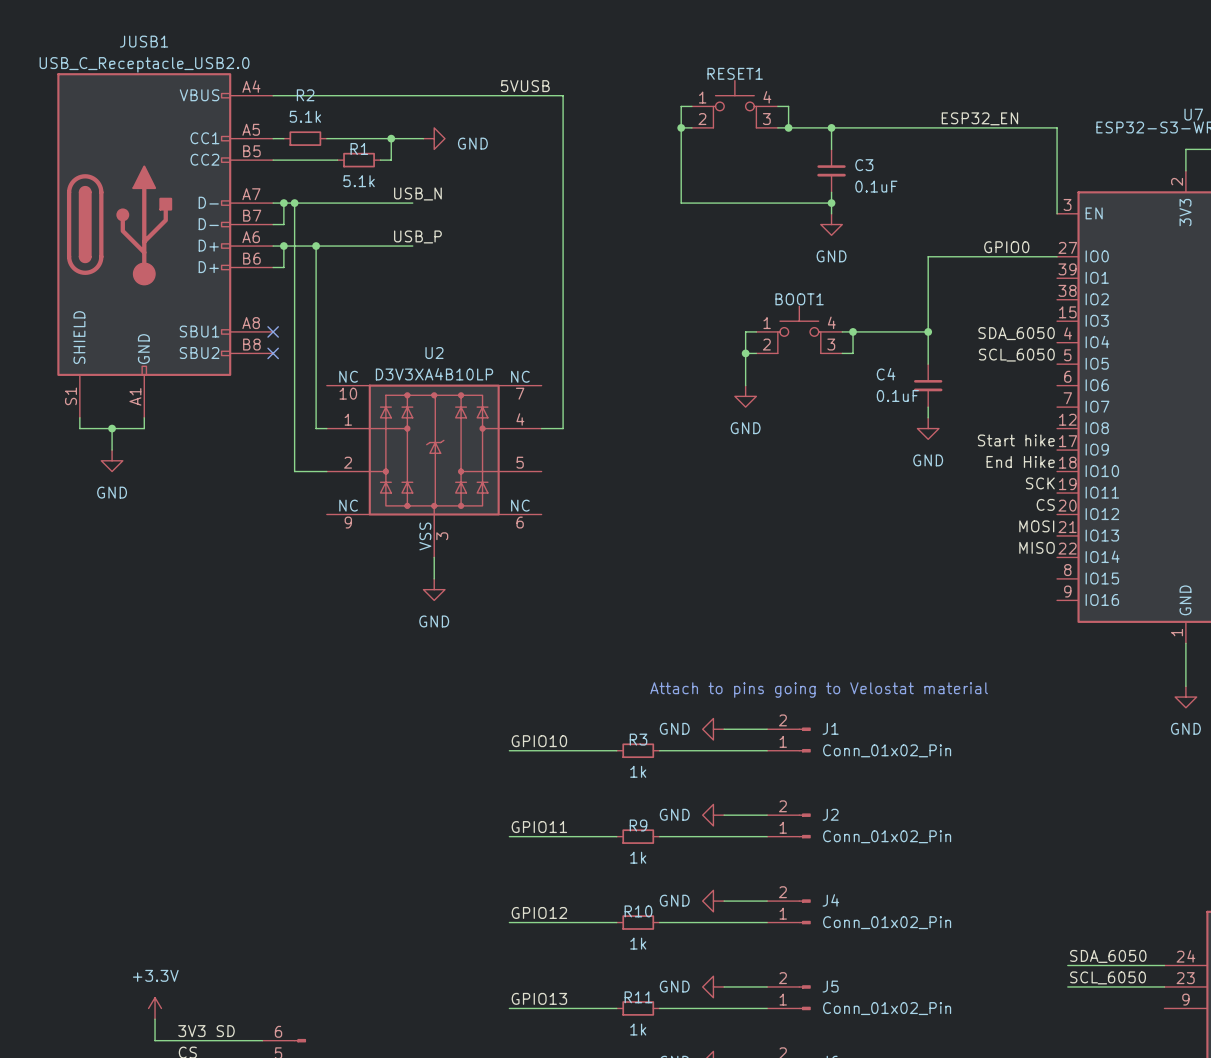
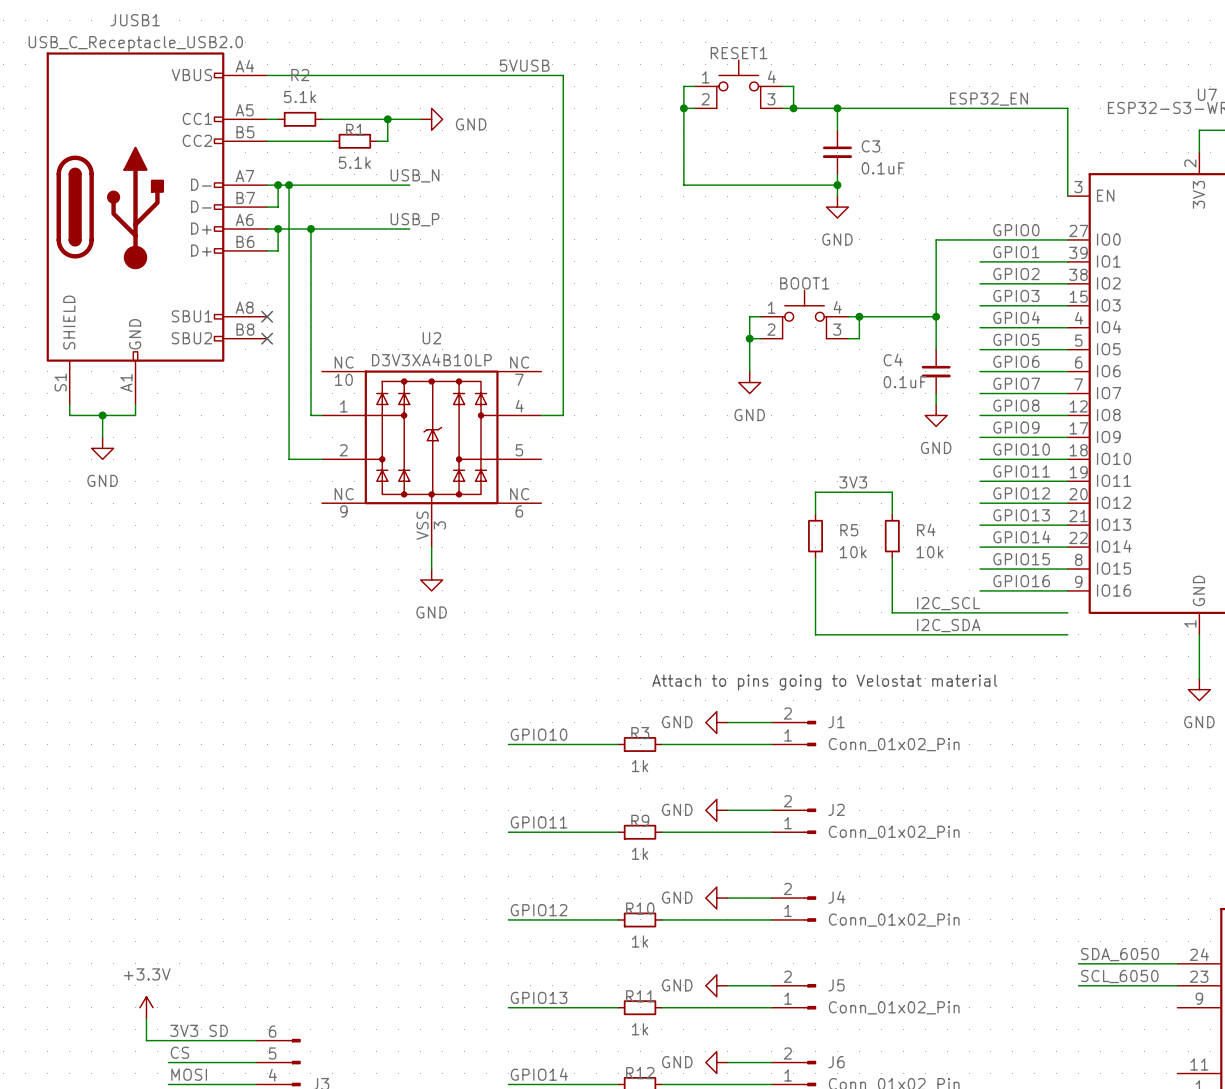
label: none -> GPIO1 (1016, 252)
wire: none -> (980, 261) (1067, 261)
label: none -> GPIO2 (1016, 274)
wire: none -> (980, 283) (1067, 283)
label: none -> GPIO3 (1016, 295)
wire: none -> (980, 305) (1067, 305)
label: none -> GPIO4 (1016, 317)
label: SDA_6050 (1016, 333) -> none
wire: none -> (980, 327) (1067, 327)
label: none -> GPIO5 (1016, 339)
label: SCL_6050 (1016, 355) -> none
wire: none -> (980, 349) (1067, 349)
label: none -> GPIO6 (1016, 361)
wire: none -> (980, 371) (1067, 371)
label: none -> GPIO7 (1016, 383)
wire: none -> (980, 393) (1067, 393)
label: none -> GPIO8 (1016, 405)
wire: none -> (980, 415) (1067, 415)
label: none -> GPIO9 (1016, 427)
label: Start hike (1016, 440) -> none
wire: none -> (980, 437) (1067, 437)
label: none -> GPIO10 (1021, 449)
label: End Hike (1020, 461) -> none
wire: none -> (980, 459) (1067, 459)
label: none -> GPIO11 (1021, 471)
label: SCK (1040, 483) -> none
wire: none -> (980, 481) (1067, 481)
label: none -> 3V3 (853, 482)
label: none -> GPIO12 (1021, 493)
label: CS (1045, 504) -> none
wire: none -> (980, 503) (1067, 503)
wire: none -> (815, 514) (815, 492) (892, 492) (892, 514)
label: none -> GPIO13 (1021, 515)
label: MOSI (1036, 526) -> none
wire: none -> (980, 525) (1067, 525)
R5: none -> 10k (815, 536)
R4: none -> 10k (892, 536)
label: none -> GPIO14 (1021, 537)
label: MISO (1037, 547) -> none
wire: none -> (980, 547) (1067, 547)
wire: none -> (815, 558) (815, 634) (1067, 634)
wire: none -> (892, 558) (892, 612) (1067, 612)
label: none -> GPIO15 (1021, 559)
wire: none -> (980, 569) (1067, 569)
label: none -> GPIO16 (1021, 581)
wire: none -> (980, 590) (1067, 590)
label: none -> I2C_SCL (948, 603)
label: none -> I2C_SDA (948, 625)

